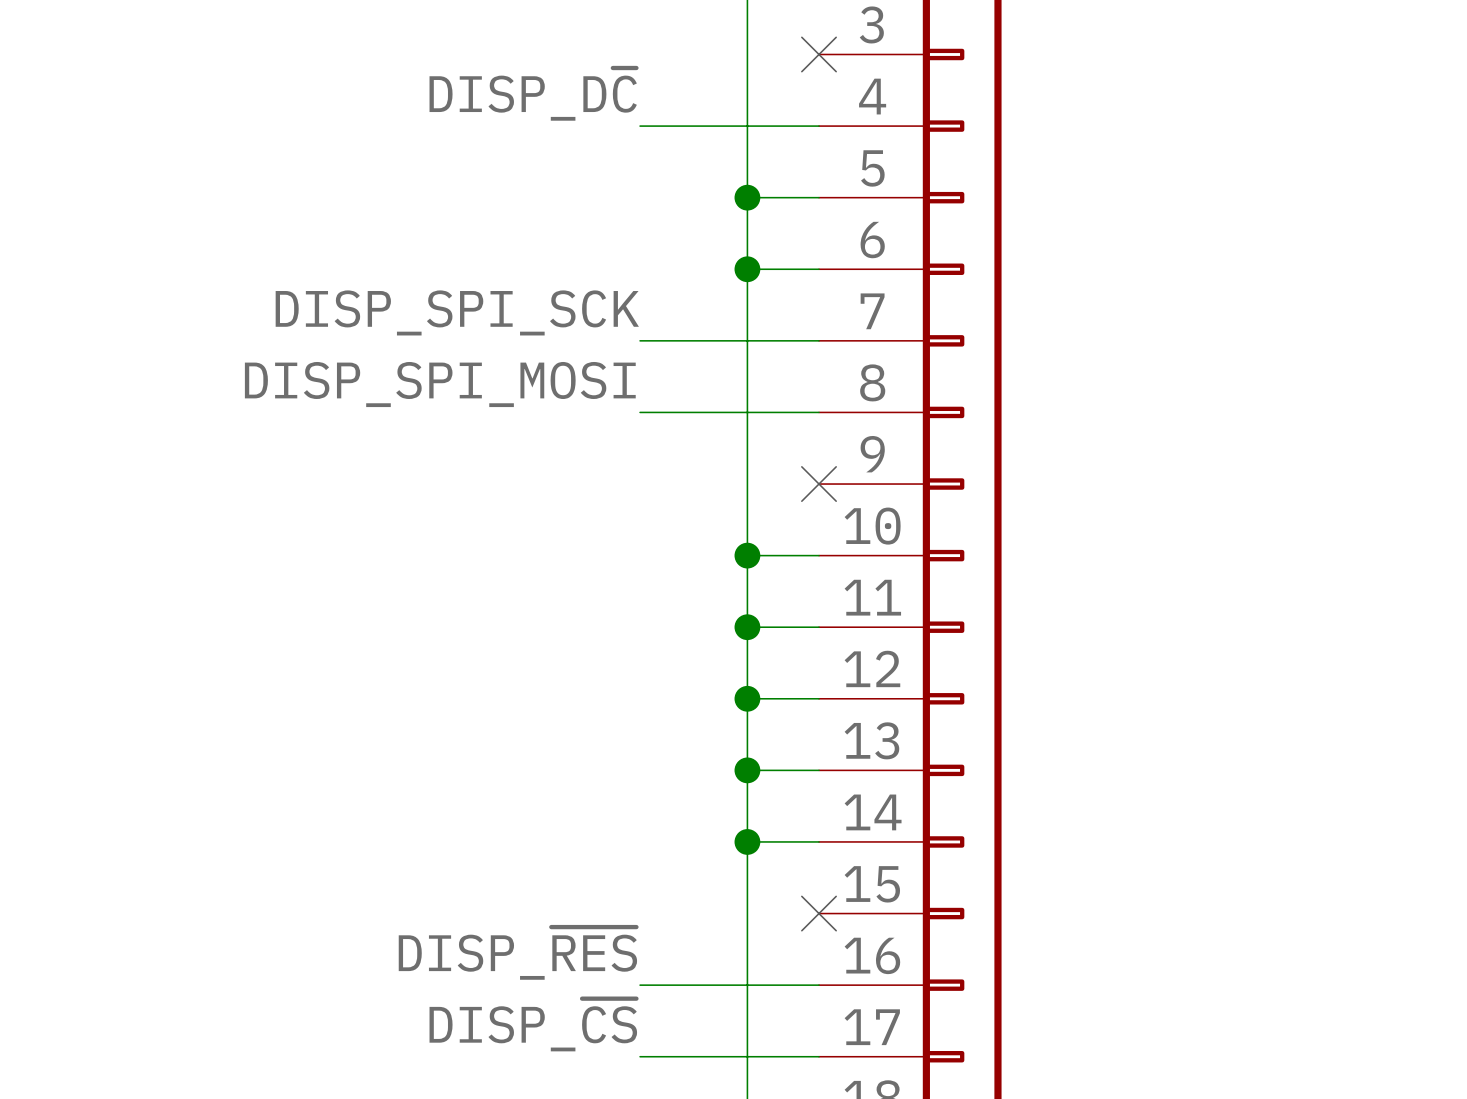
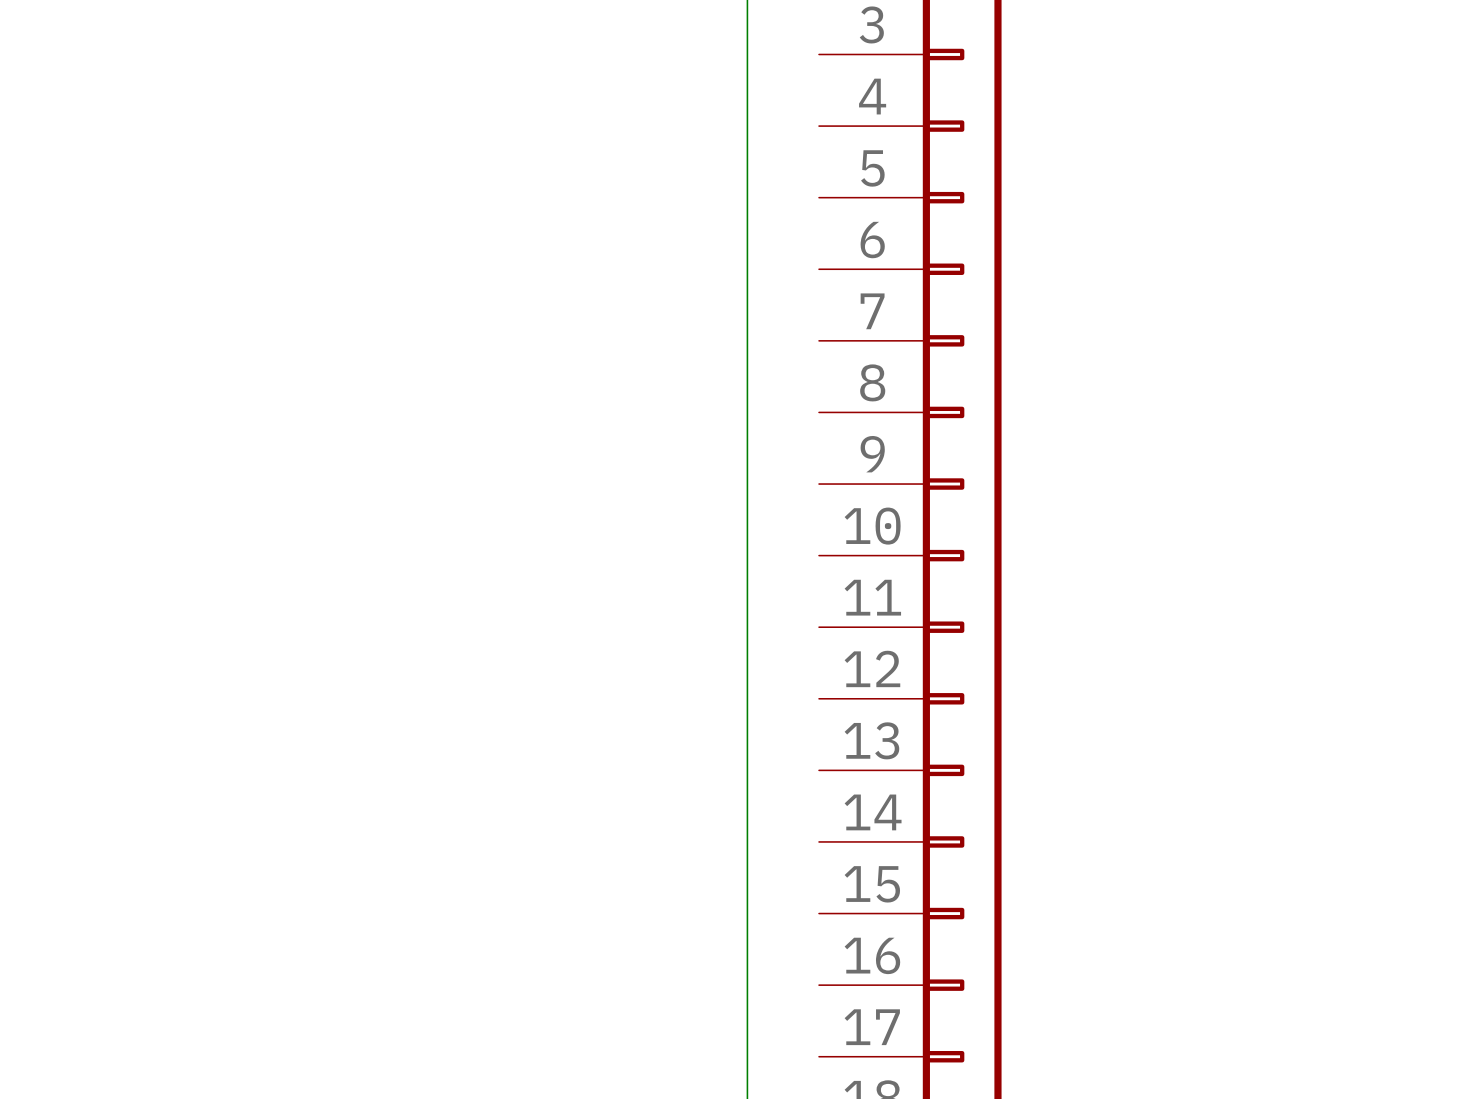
no-connect mark: (819, 54) -> none
label: DISP_D~{C} (533, 94) -> none
wire: (640, 126) (819, 126) -> none
wire: (747, 197) (819, 197) -> none
junction: (747, 197) -> none
wire: (747, 269) (819, 269) -> none
junction: (747, 269) -> none
label: DISP_SPI_SCK (457, 312) -> none
wire: (640, 340) (819, 340) -> none
label: DISP_SPI_MOSI (440, 384) -> none
wire: (640, 412) (819, 412) -> none
no-connect mark: (819, 484) -> none
wire: (747, 555) (819, 555) -> none
junction: (747, 555) -> none
wire: (747, 627) (819, 627) -> none
junction: (747, 627) -> none
wire: (747, 698) (819, 698) -> none
junction: (747, 698) -> none
wire: (747, 770) (819, 770) -> none
junction: (747, 770) -> none
wire: (747, 841) (819, 841) -> none
junction: (747, 841) -> none
no-connect mark: (819, 913) -> none
label: DISP_~{RES} (517, 953) -> none
wire: (640, 985) (819, 985) -> none
label: DISP_~{CS} (533, 1025) -> none
wire: (640, 1056) (819, 1056) -> none

